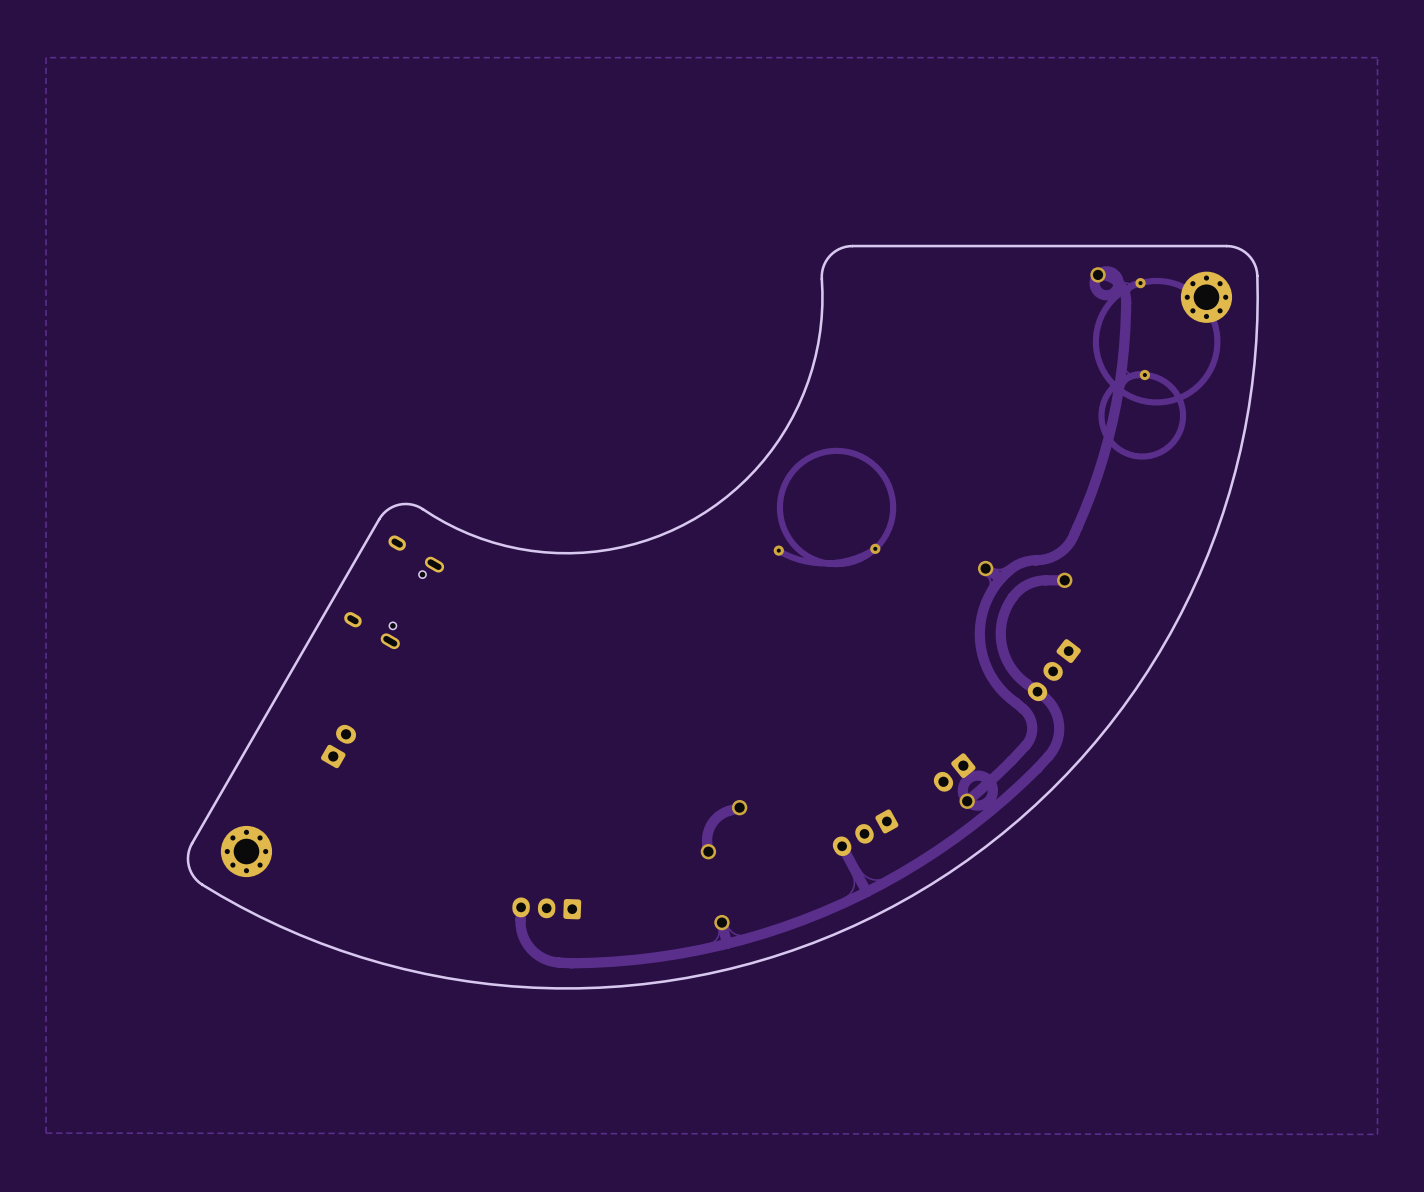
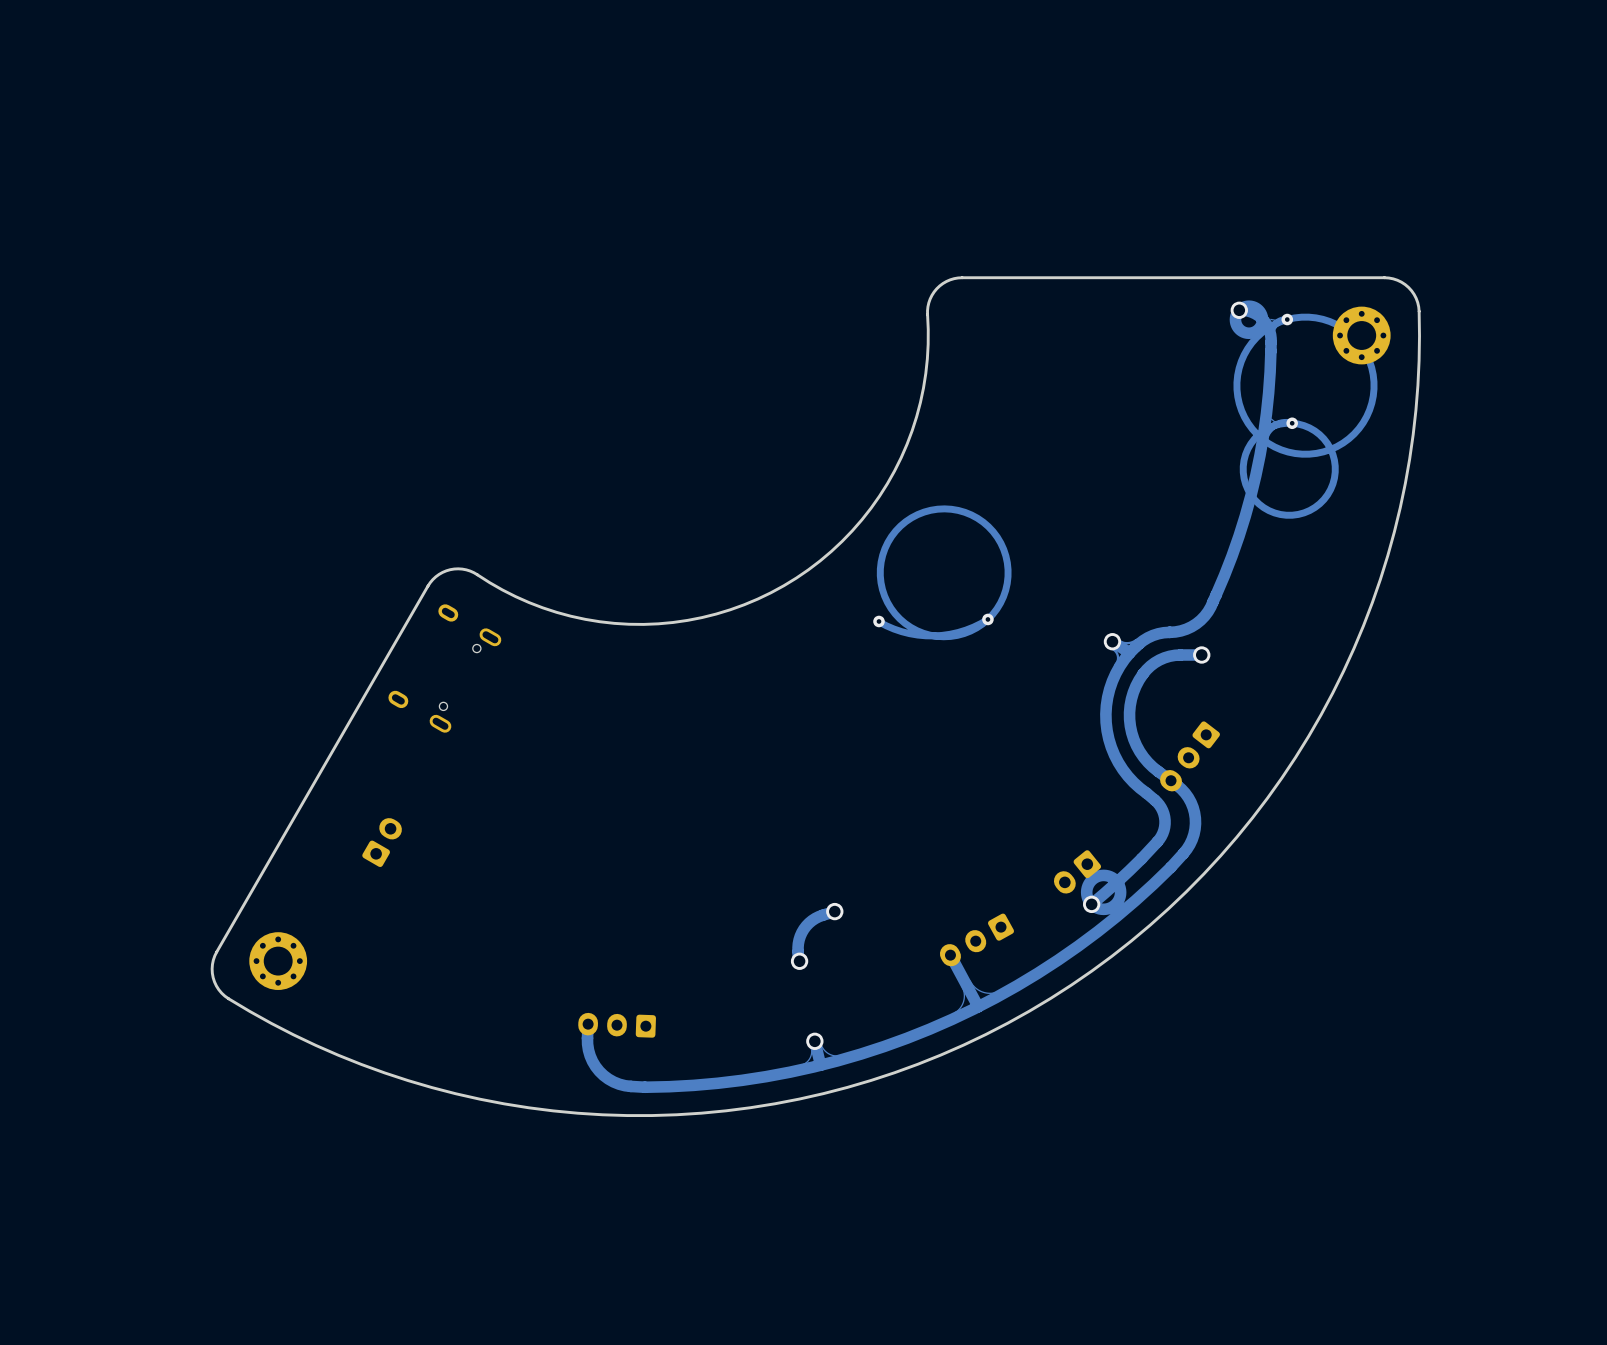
zone outline: (1377, 57) (46, 57) (46, 1133) (1377, 1134) (1377, 57) -> none

